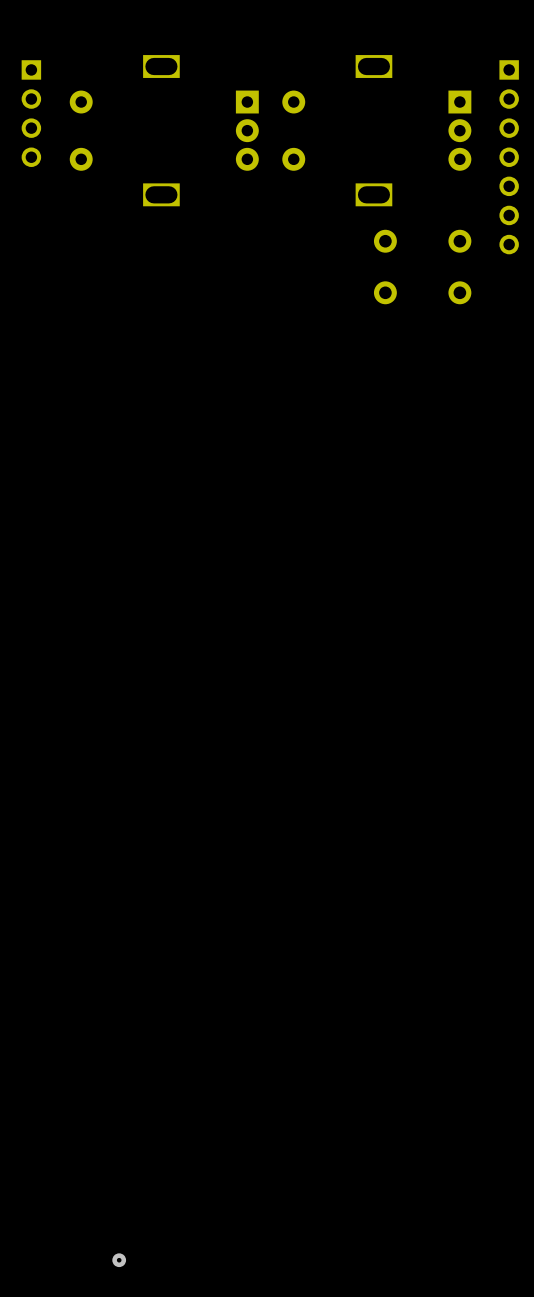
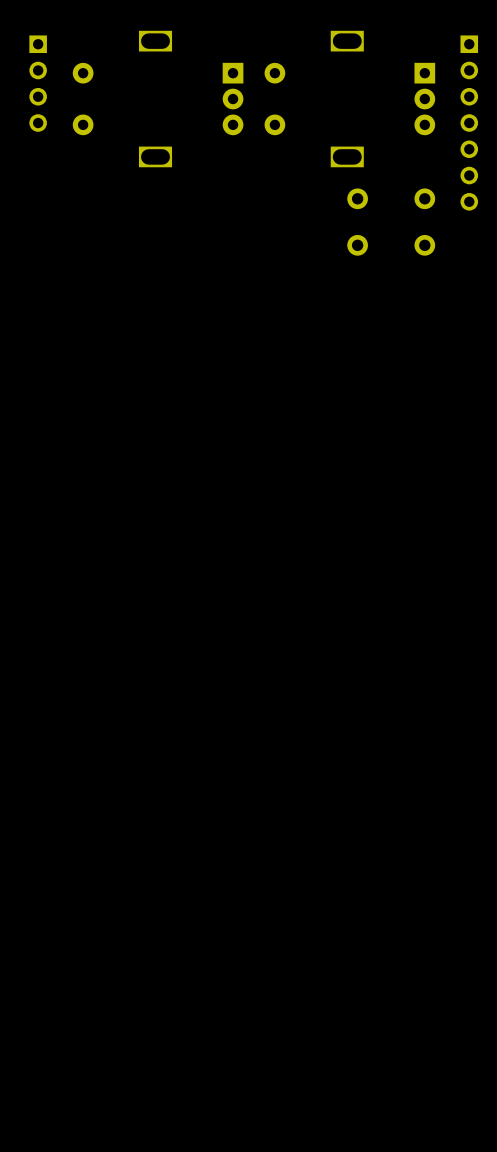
via: (119, 1260) -> none

